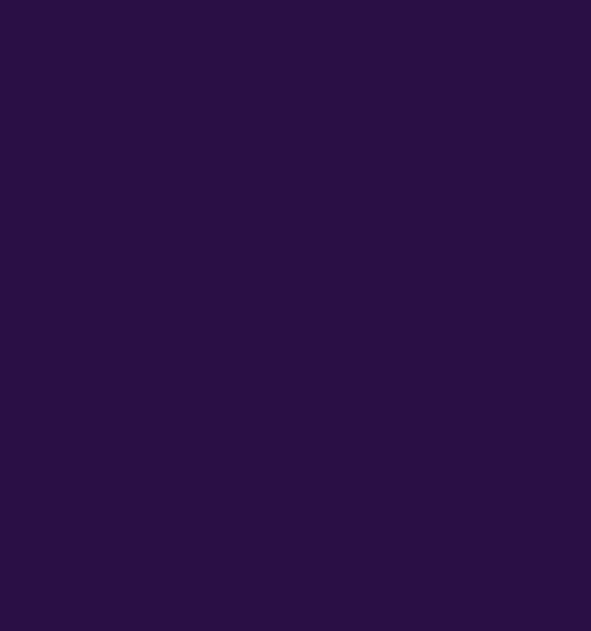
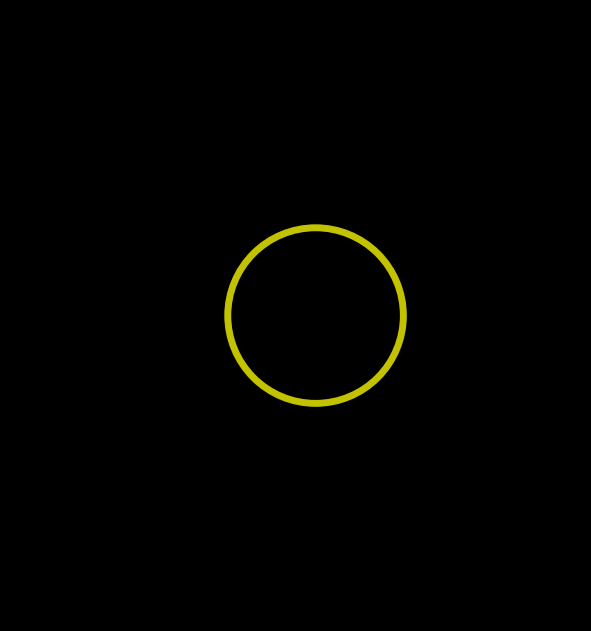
round board edge: none -> [224, 224, 407, 407]

